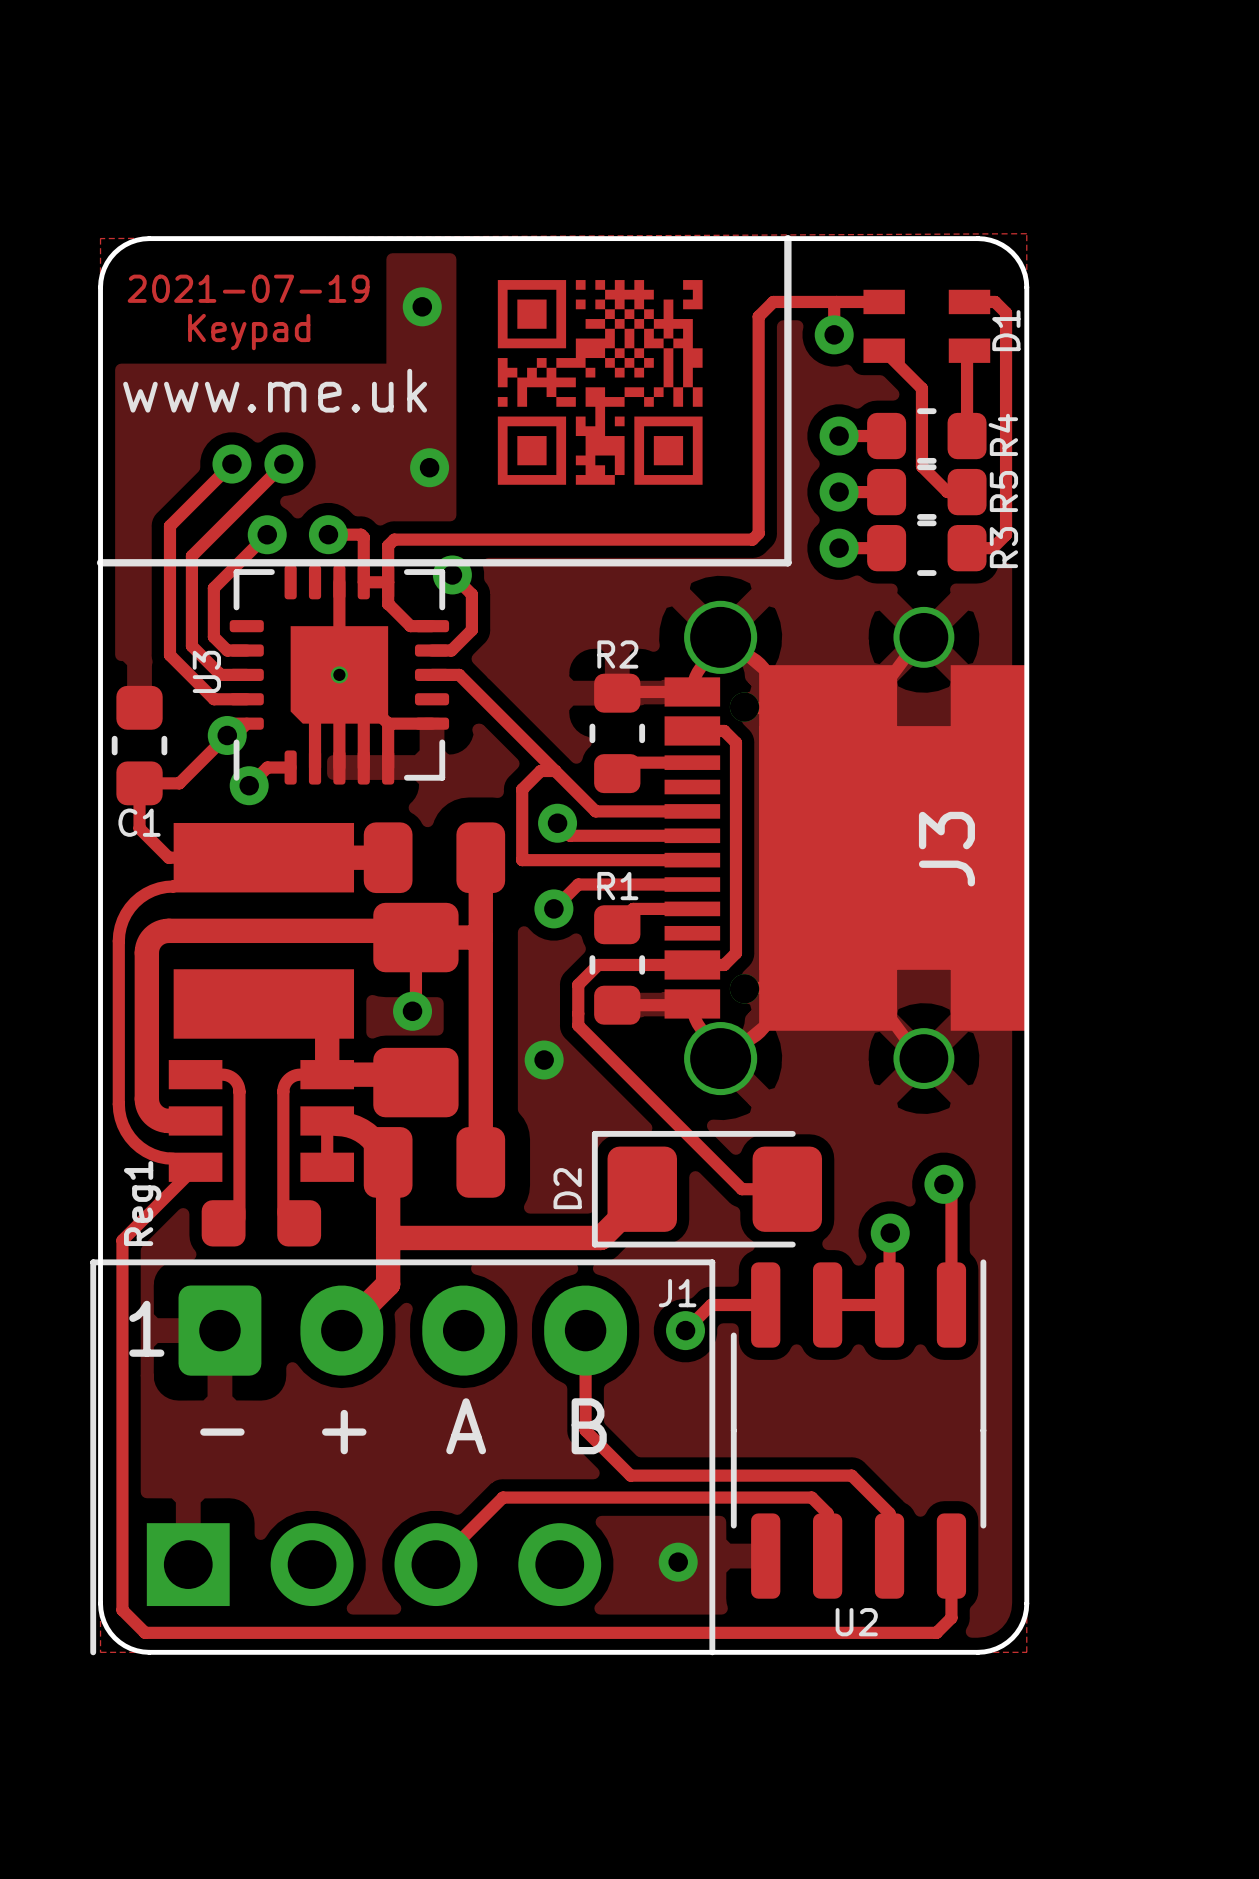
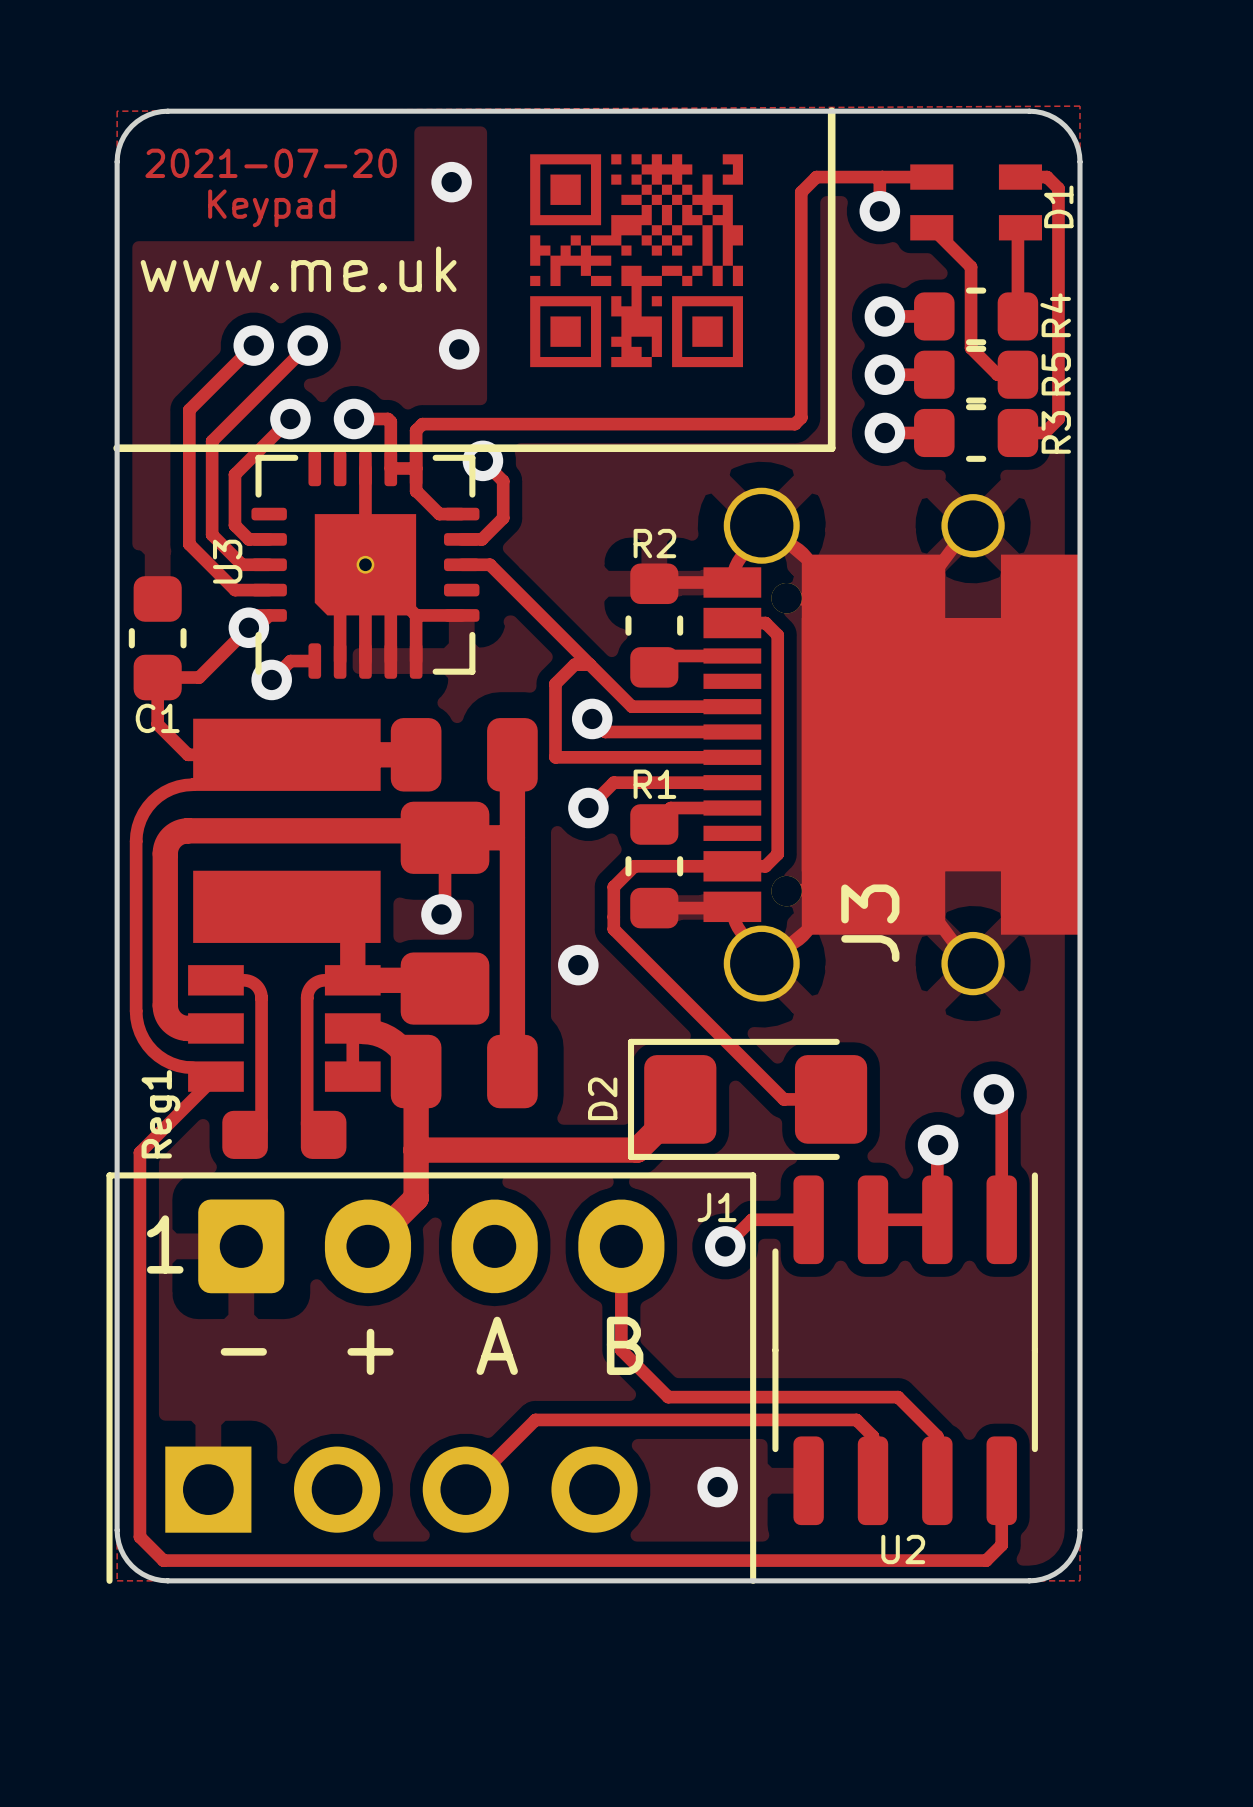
text: 2021-07-19 (248, 288) -> 2021-07-20 (271, 163)
J3 name position: J3 (946, 849) -> J3 (870, 923)

